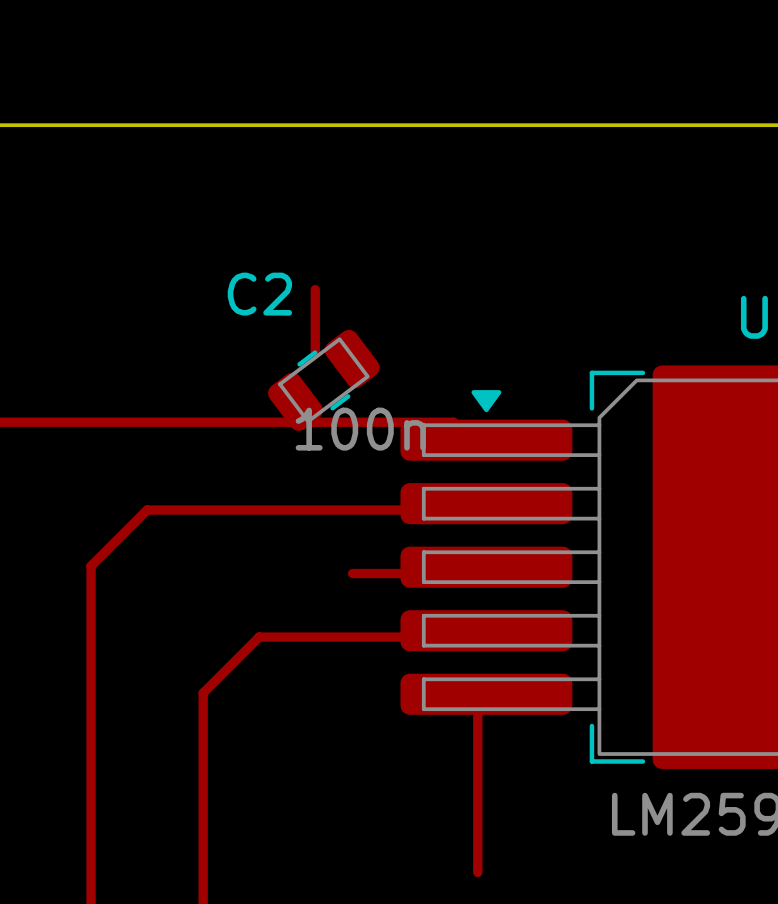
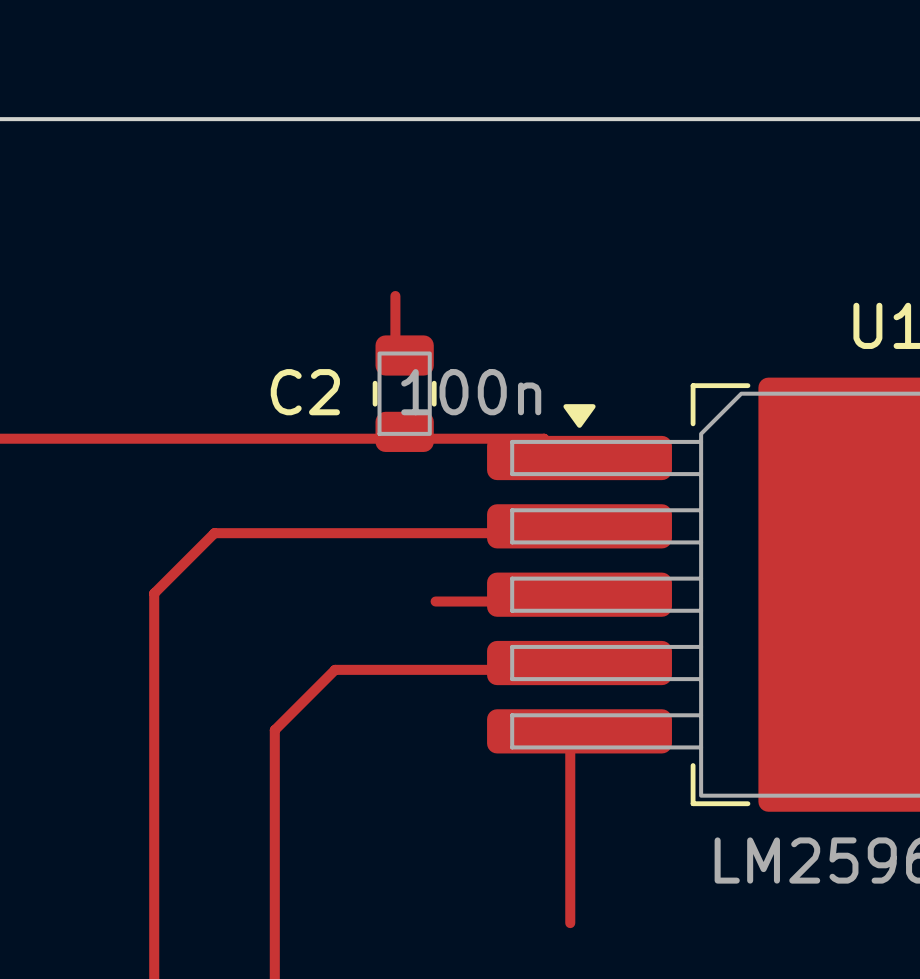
C2 rotation: 0° (323, 380) -> 53° counterclockwise (404, 393)

